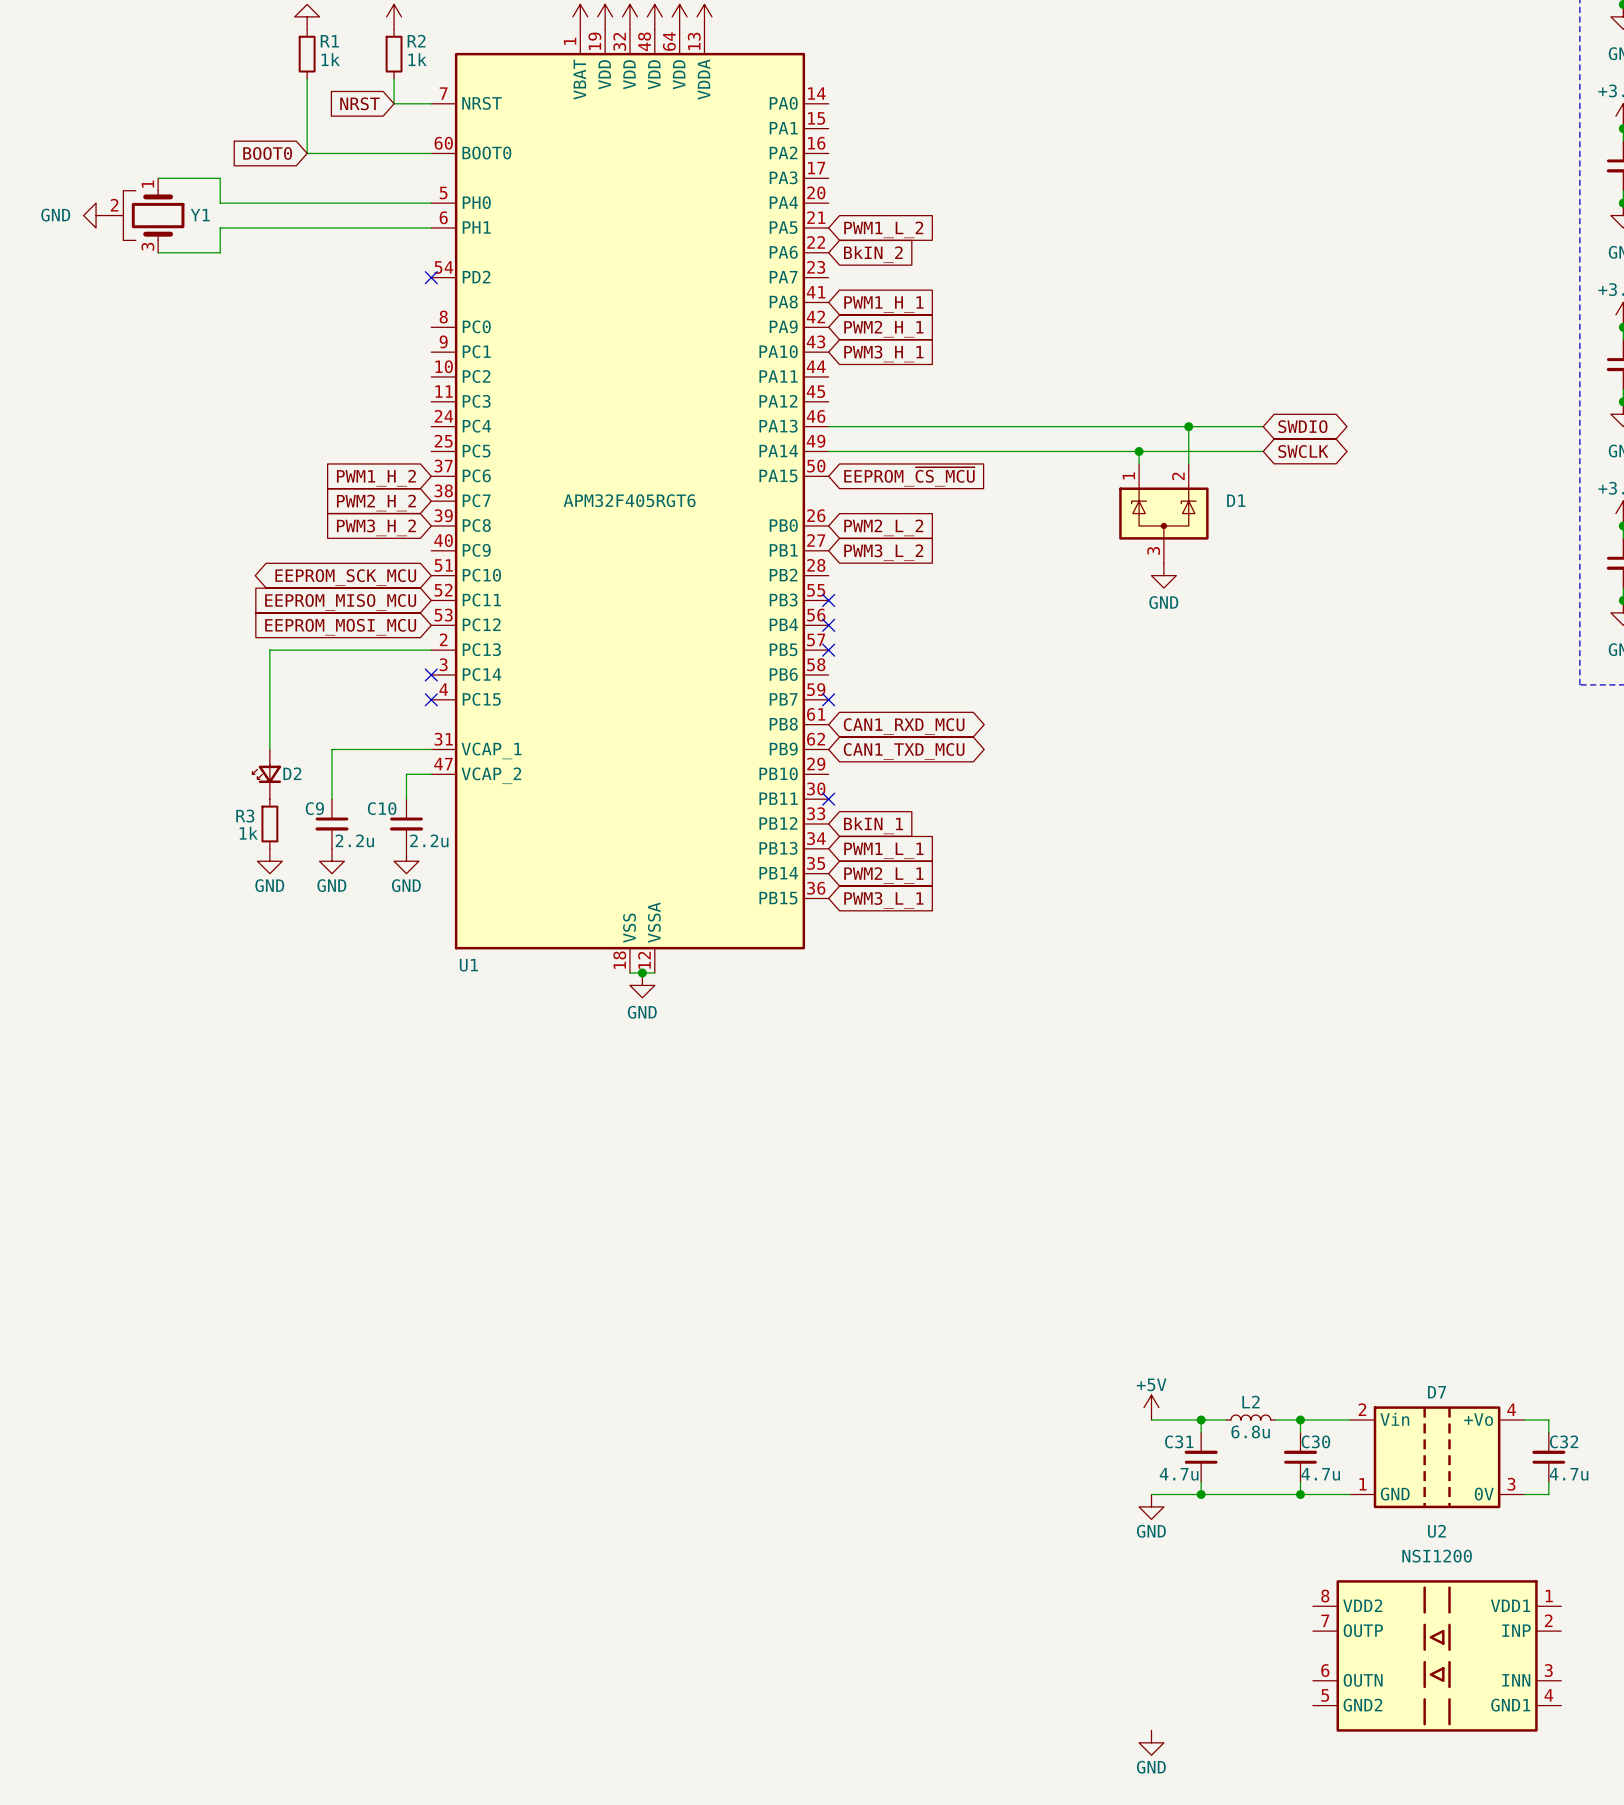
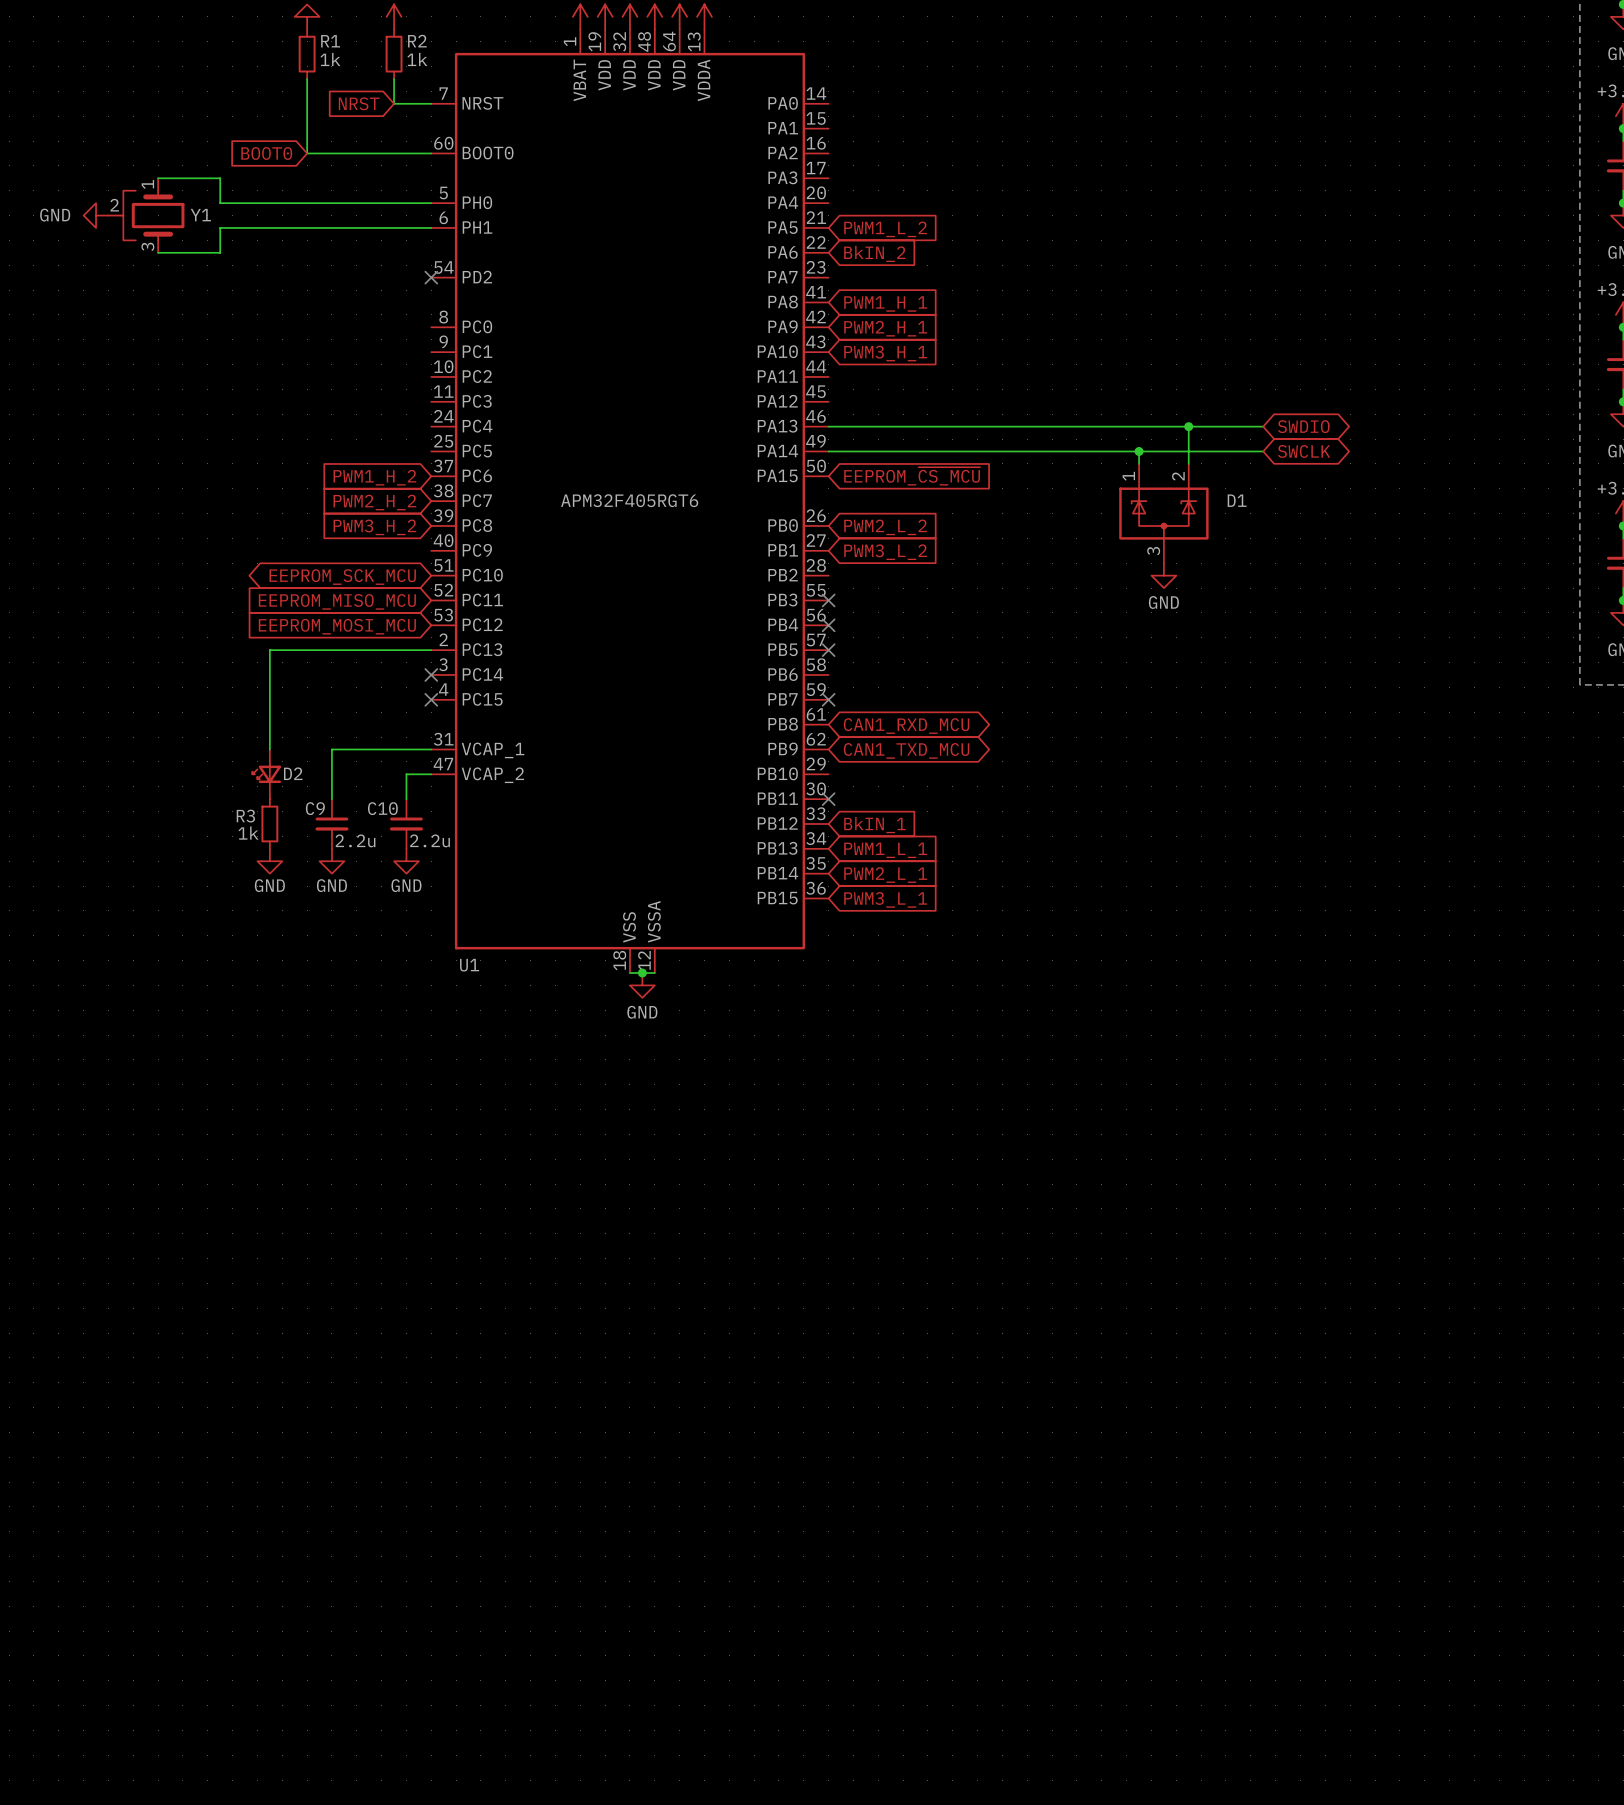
power symbol: +5V (1151, 1407) -> none
L2: 6.8u (1250, 1417) -> none
wire: (1151, 1420) (1225, 1420) -> none
wire: (1201, 1420) (1201, 1432) -> none
junction: (1201, 1420) -> none
wire: (1275, 1420) (1350, 1420) -> none
wire: (1300, 1420) (1300, 1432) -> none
junction: (1300, 1420) -> none
wire: (1524, 1420) (1548, 1420) (1548, 1432) -> none
C31: 4.7u (1201, 1457) -> none
C30: 4.7u (1300, 1457) -> none
D7: (1437, 1457) -> none
C32: 4.7u (1548, 1457) -> none
wire: (1201, 1482) (1201, 1494) -> none
wire: (1300, 1482) (1300, 1494) -> none
wire: (1548, 1482) (1548, 1494) (1524, 1494) -> none
wire: (1151, 1494) (1350, 1494) -> none
junction: (1201, 1494) -> none
junction: (1300, 1494) -> none
power symbol: GND (1151, 1506) -> none
U2: NSI1200 (1437, 1655) -> none
power symbol: GND (1151, 1742) -> none

